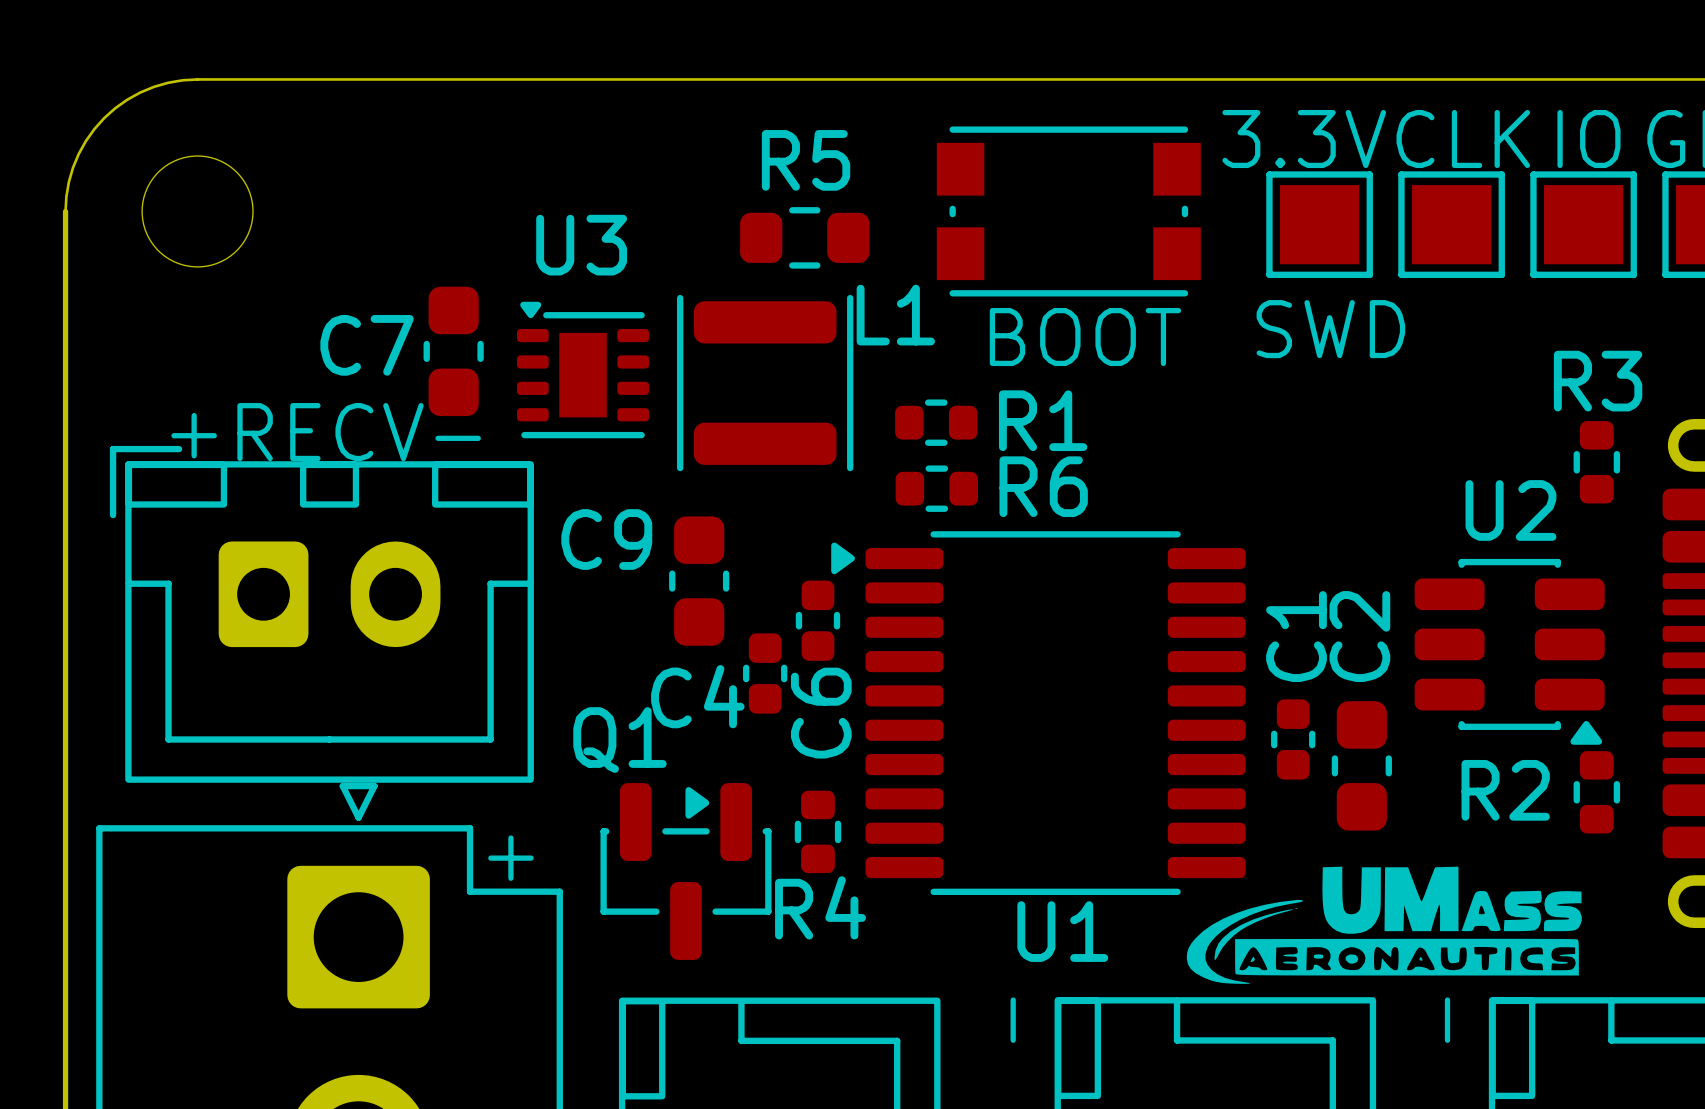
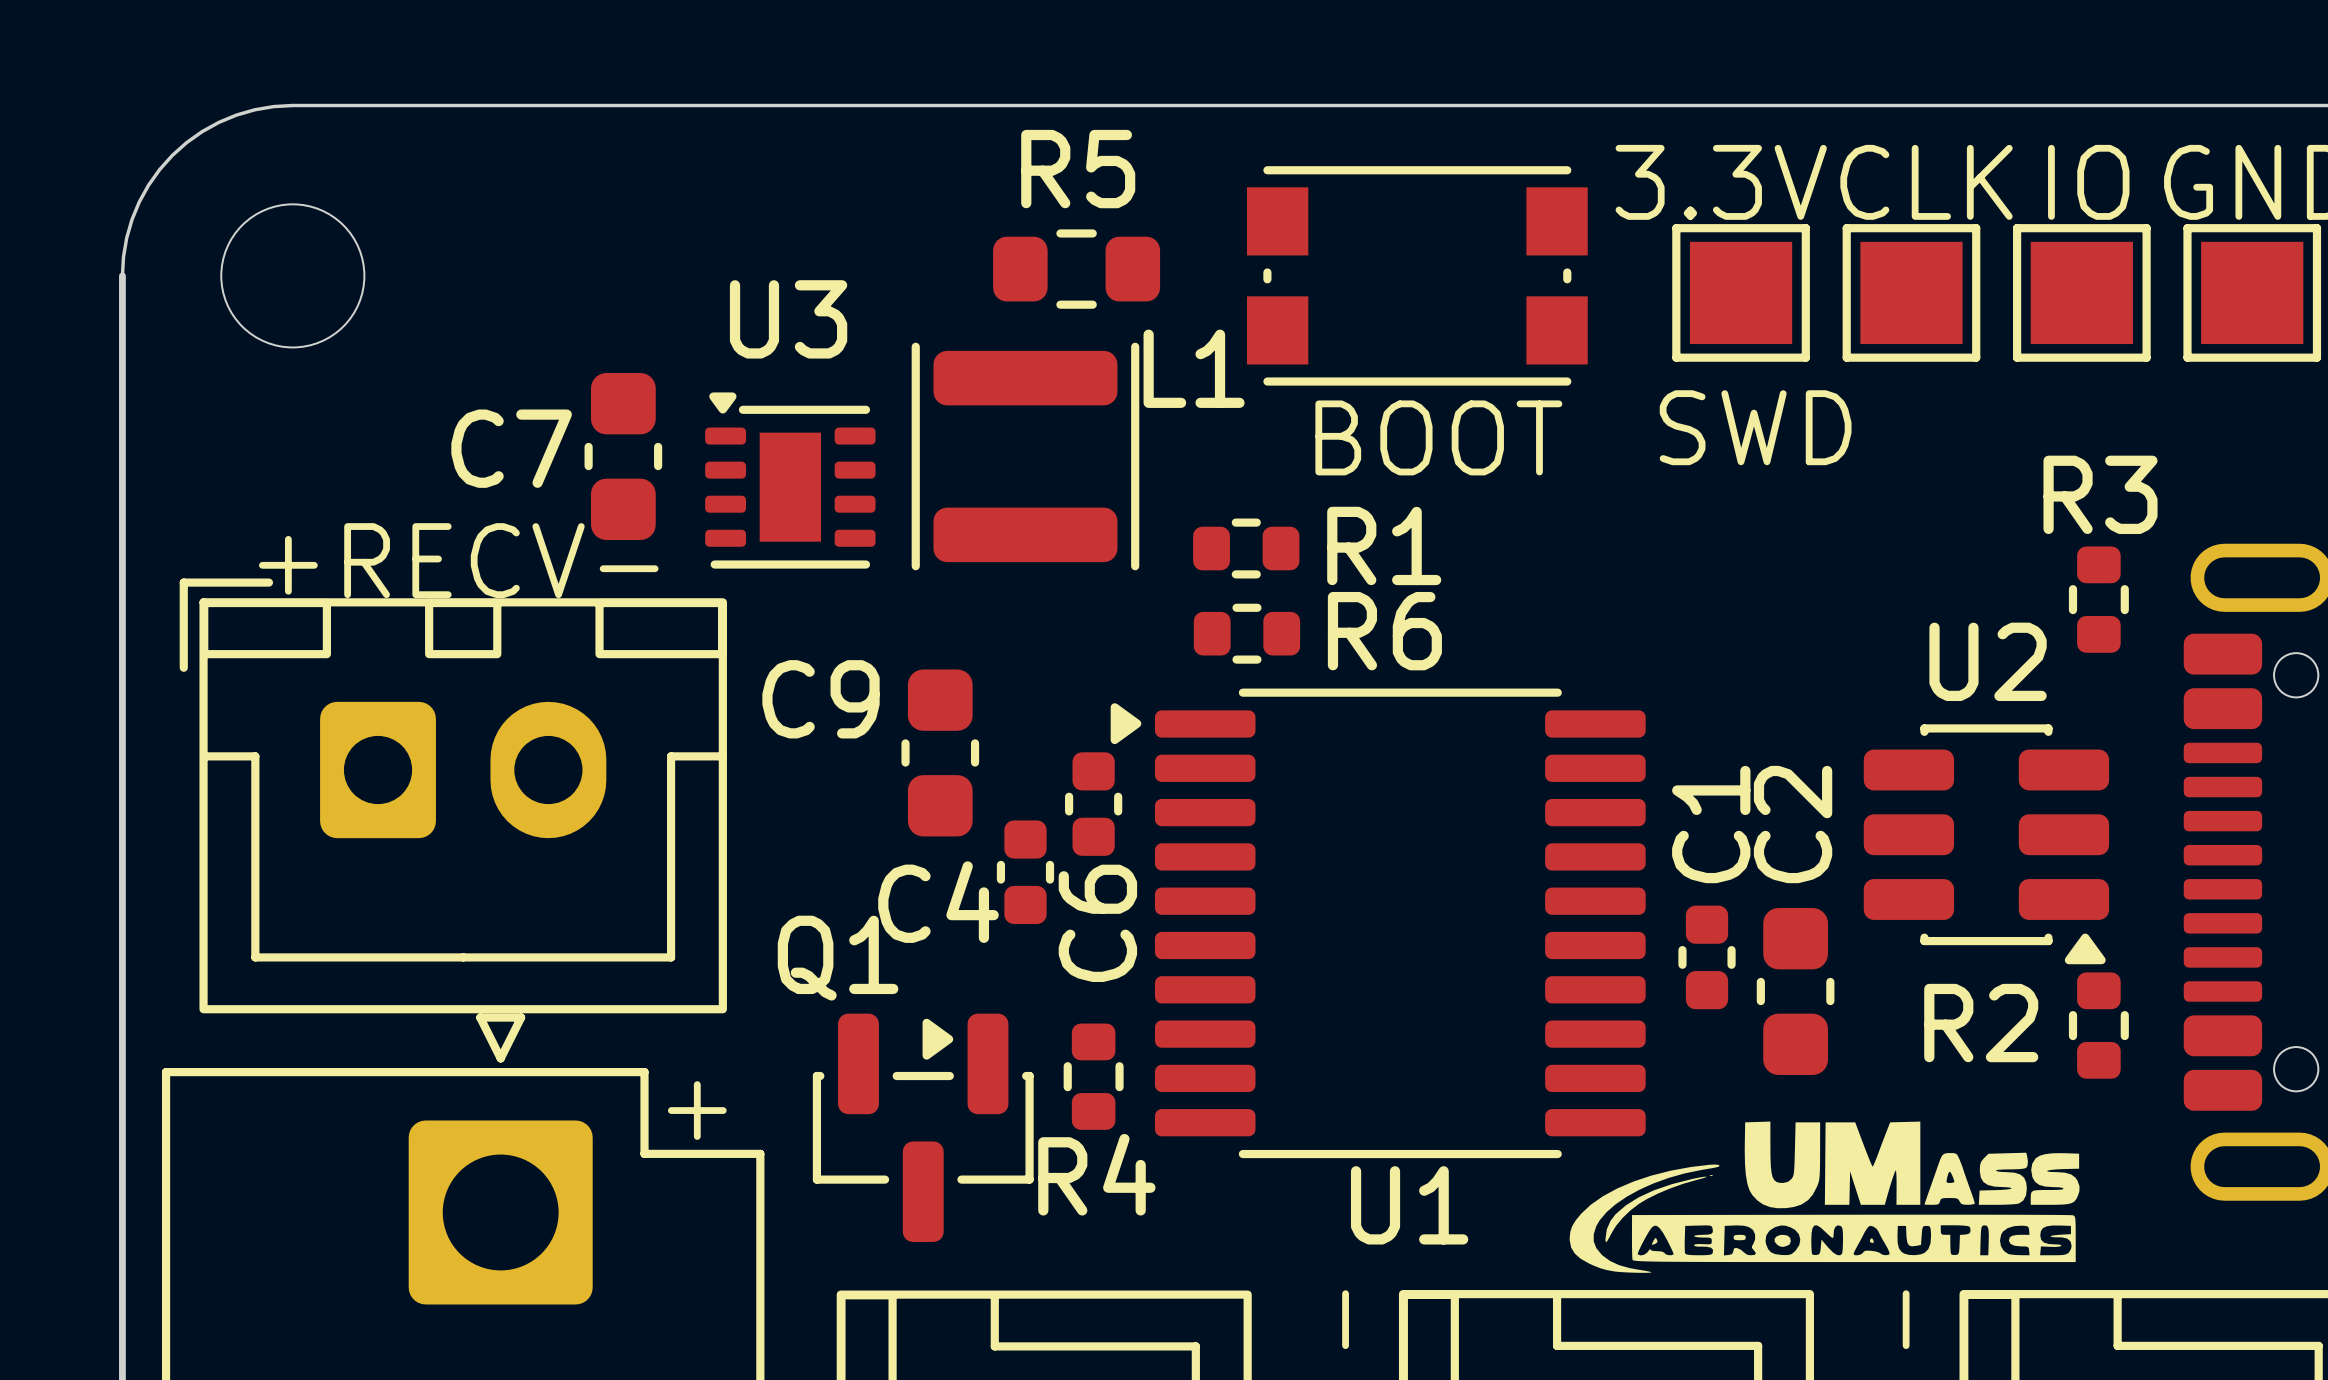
R5 position: (804, 237) -> (1076, 269)
L1 position: (765, 383) -> (1025, 456)

